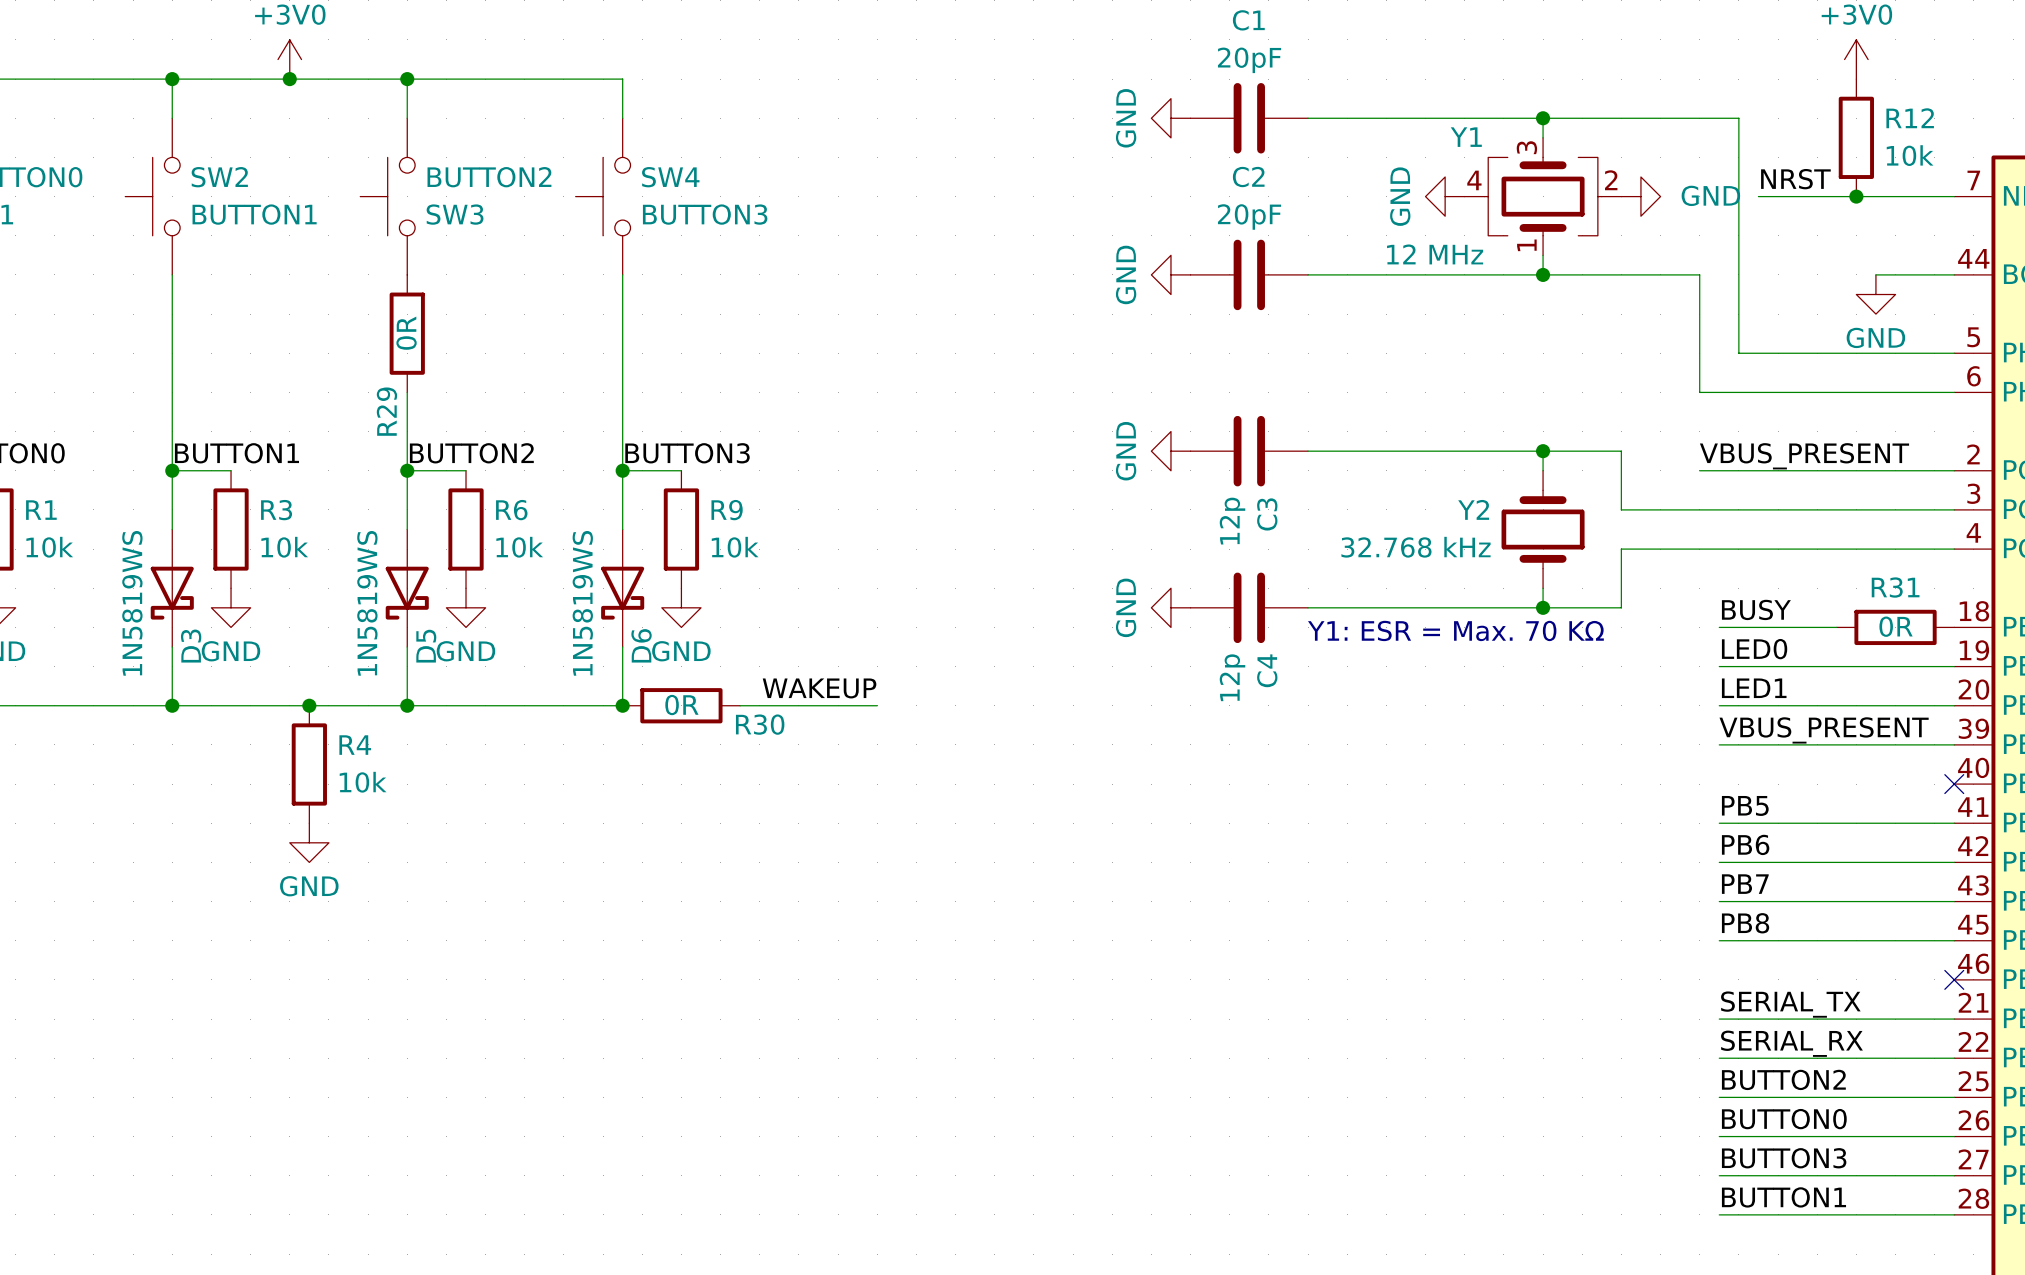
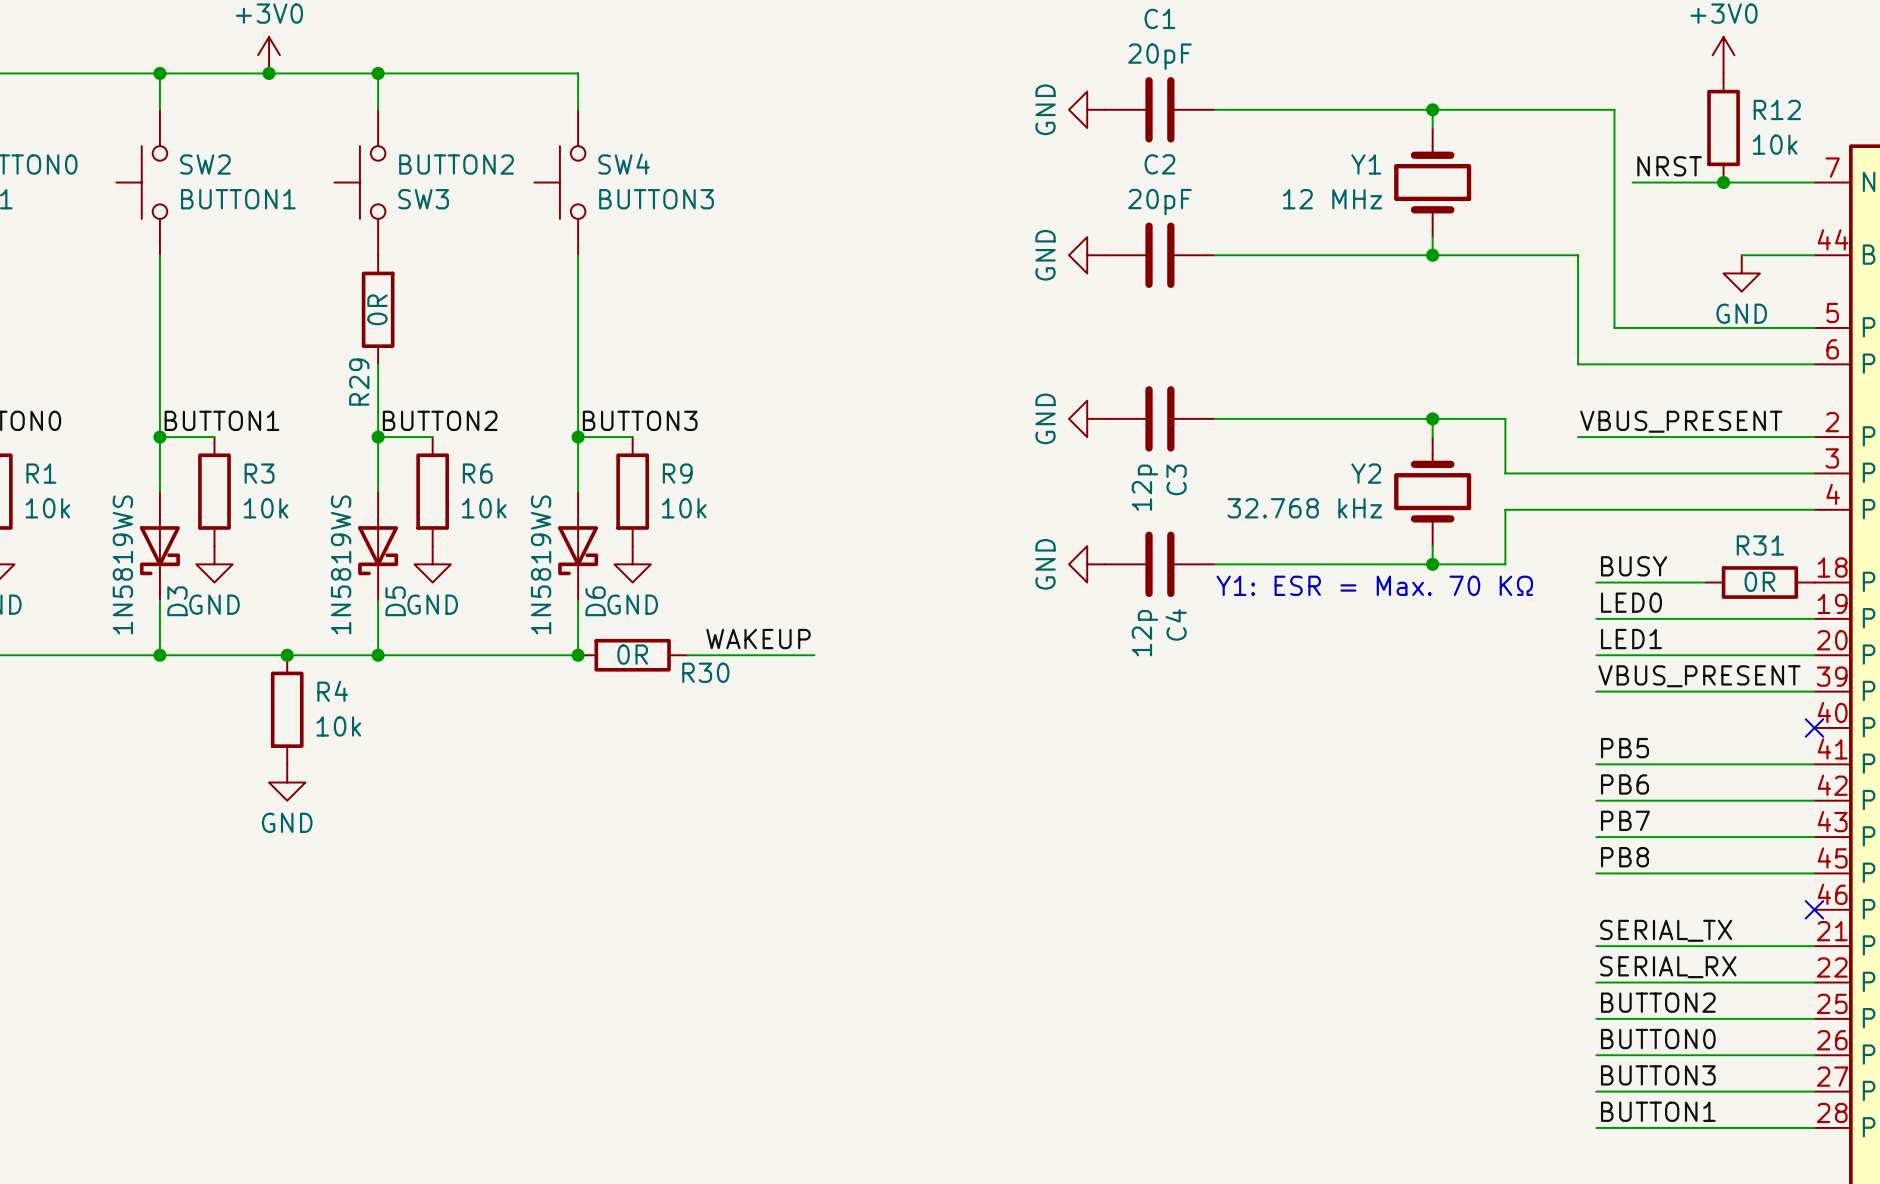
Y1 symbol: [1464, 137, 1622, 256] -> [1394, 127, 1472, 238]
Y1 name position: Y1 (1466, 137) -> Y1 (1366, 164)
power symbol: GND (1445, 196) -> none
power symbol: GND (1640, 196) -> none
Y1 value position: 12 MHz (1435, 254) -> 12 MHz (1332, 199)

